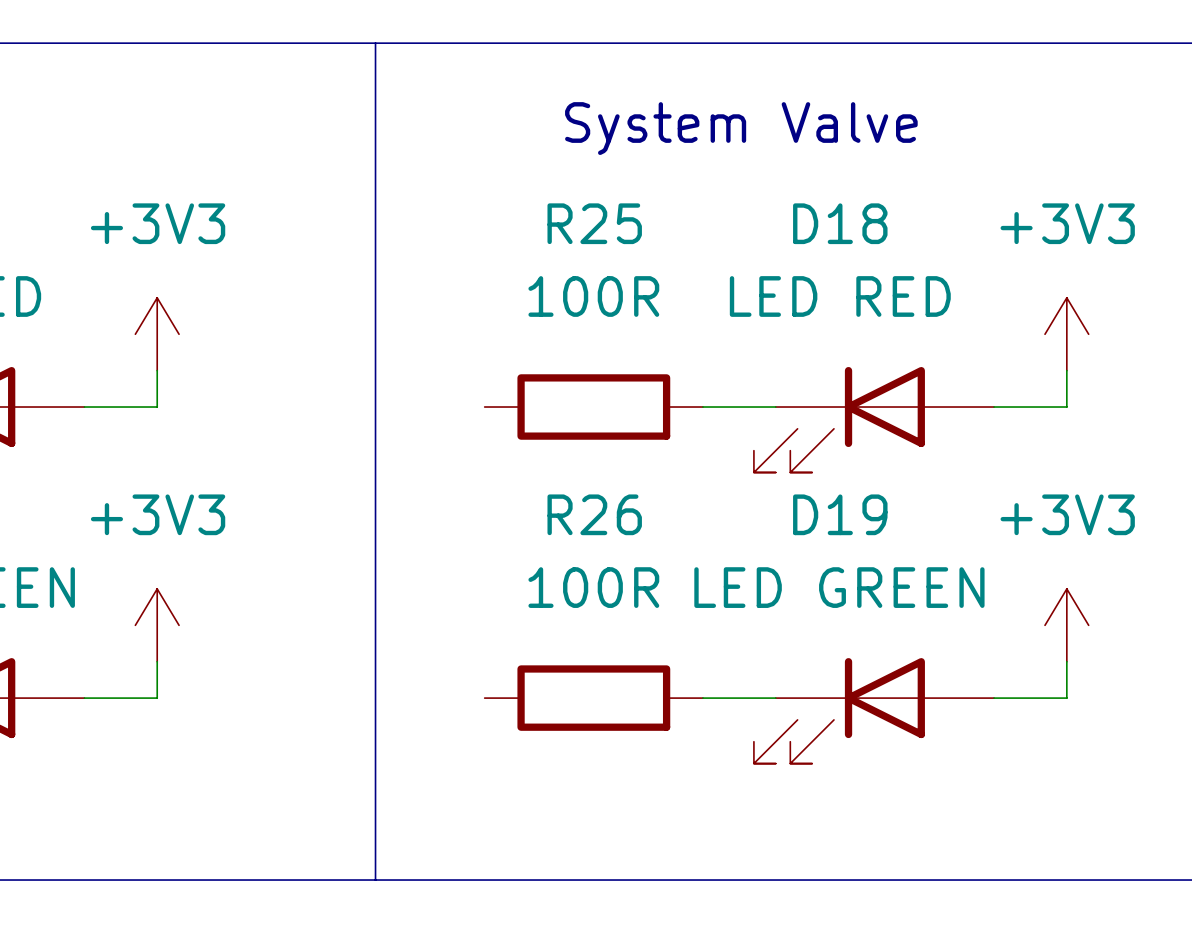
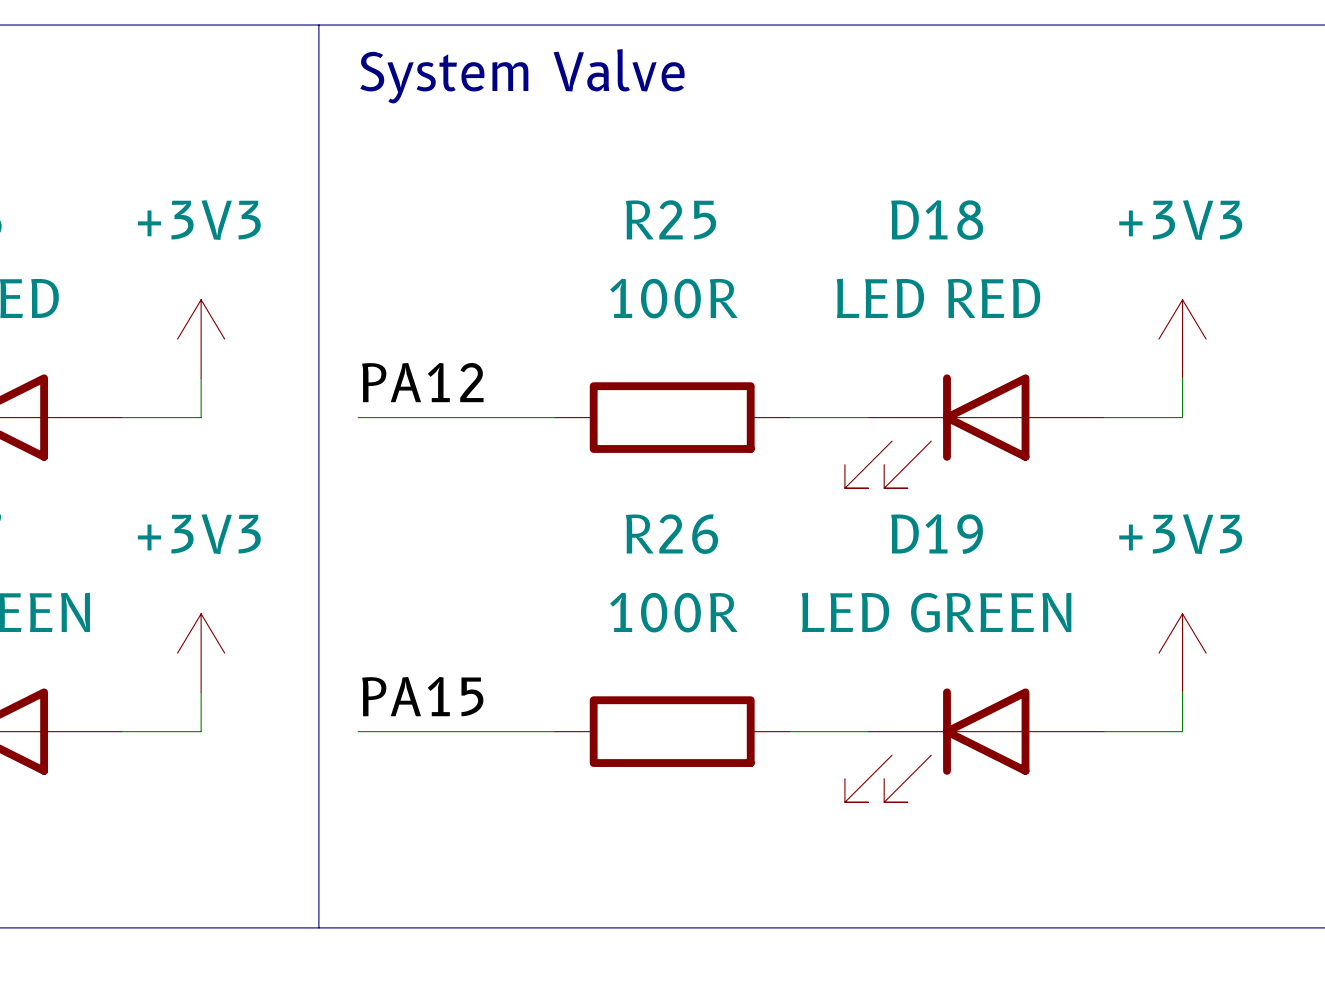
line: (375, 43) (375, 880) -> (318, 25) (318, 927)
text position: System Valve (741, 128) -> System Valve (522, 76)
label: none -> PA12 (422, 382)
wire: none -> (358, 417) (554, 417)
label: none -> PA15 (422, 696)
wire: none -> (358, 731) (554, 731)

